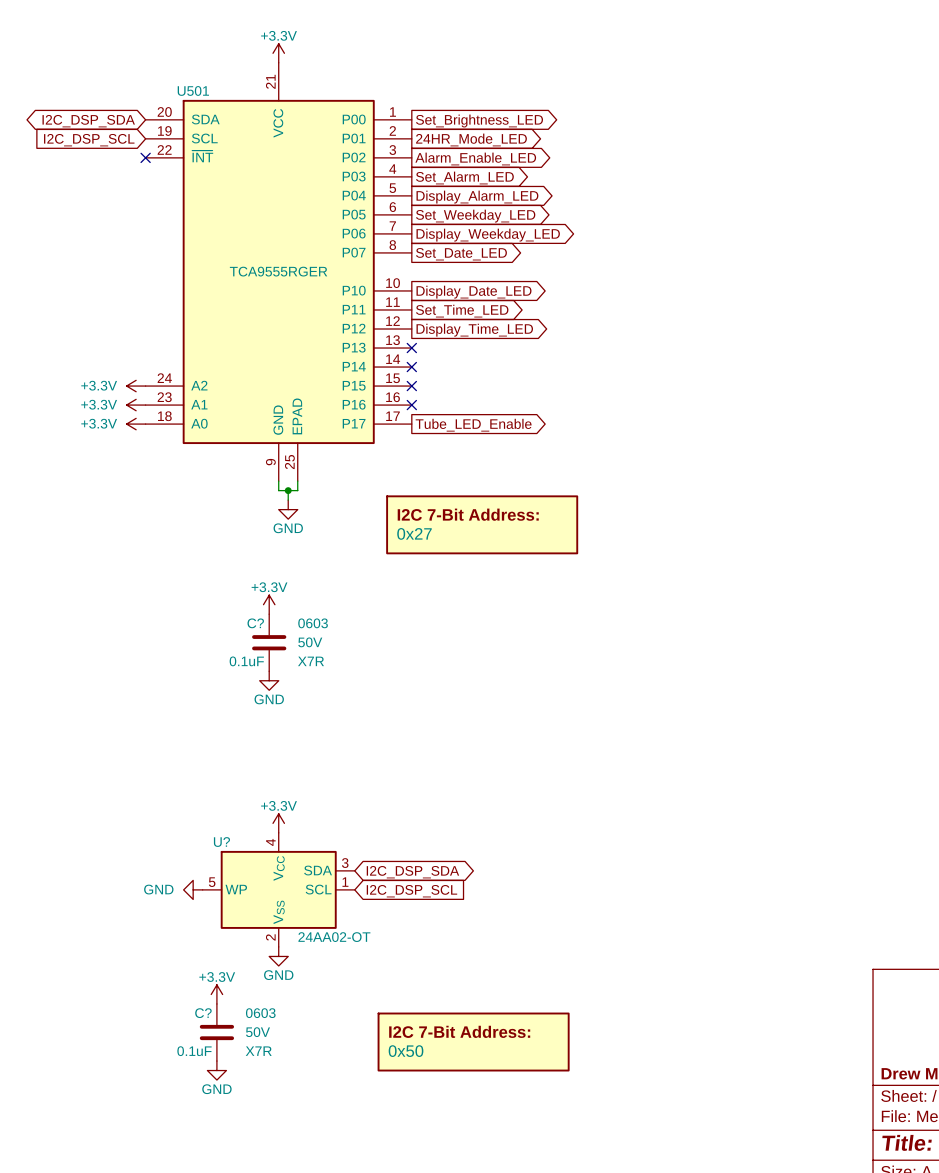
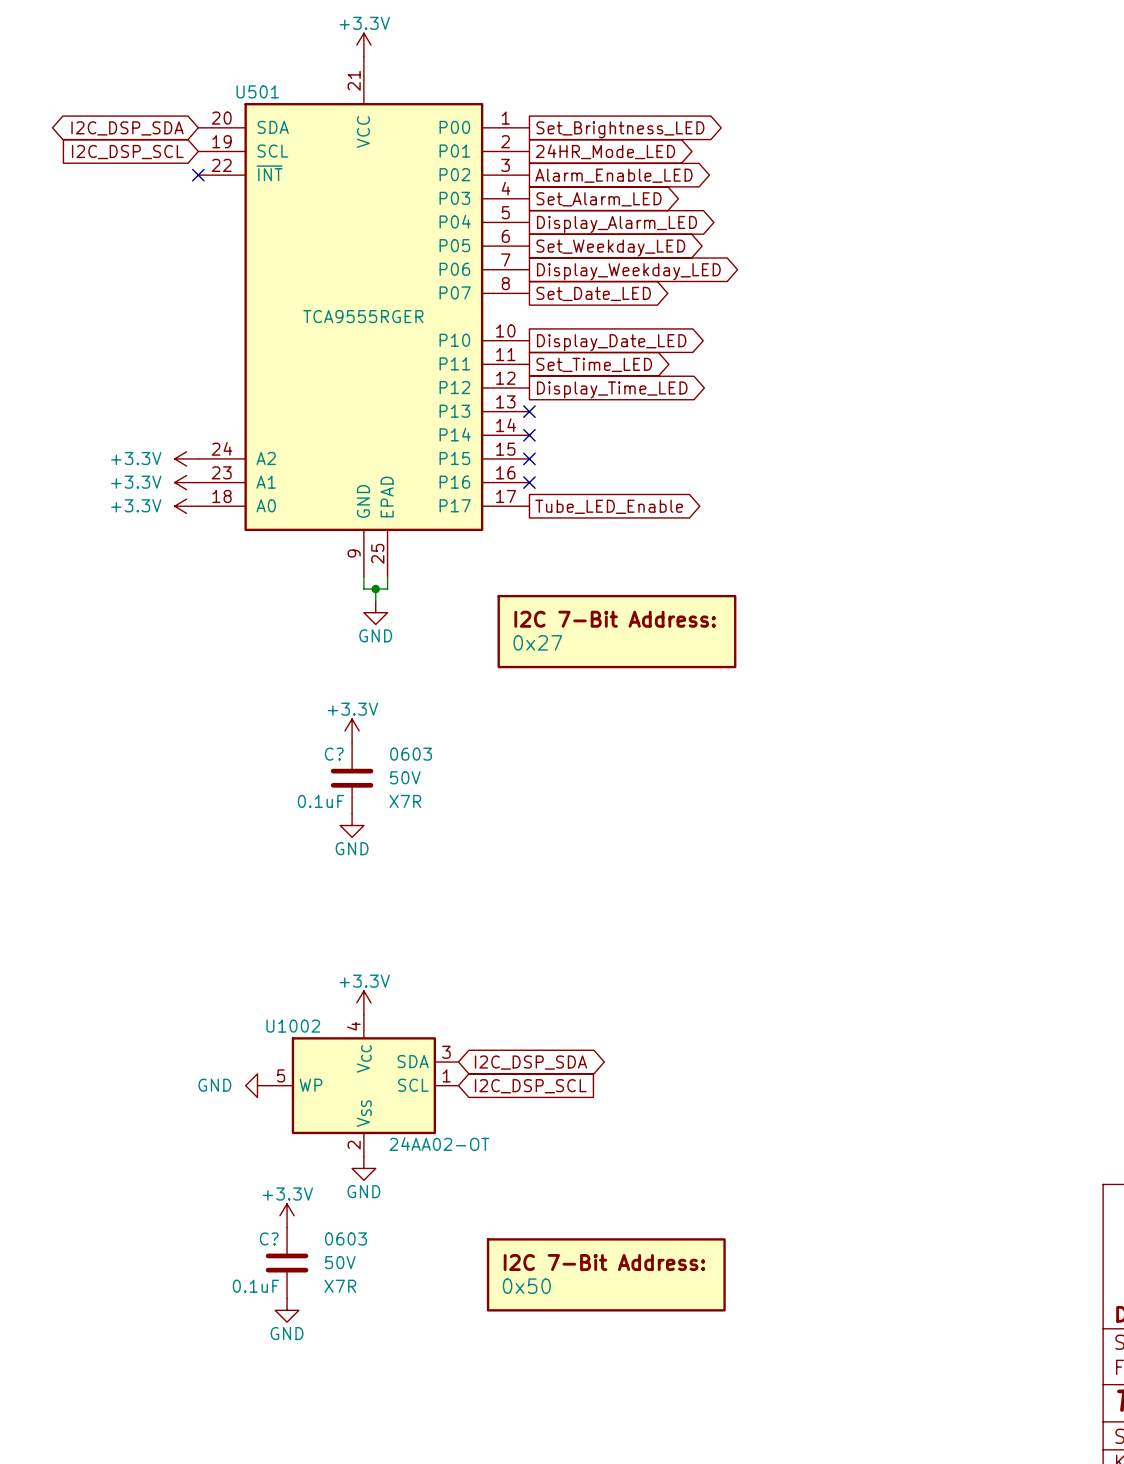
U? name: U? (221, 842) -> U1002 (293, 1026)

